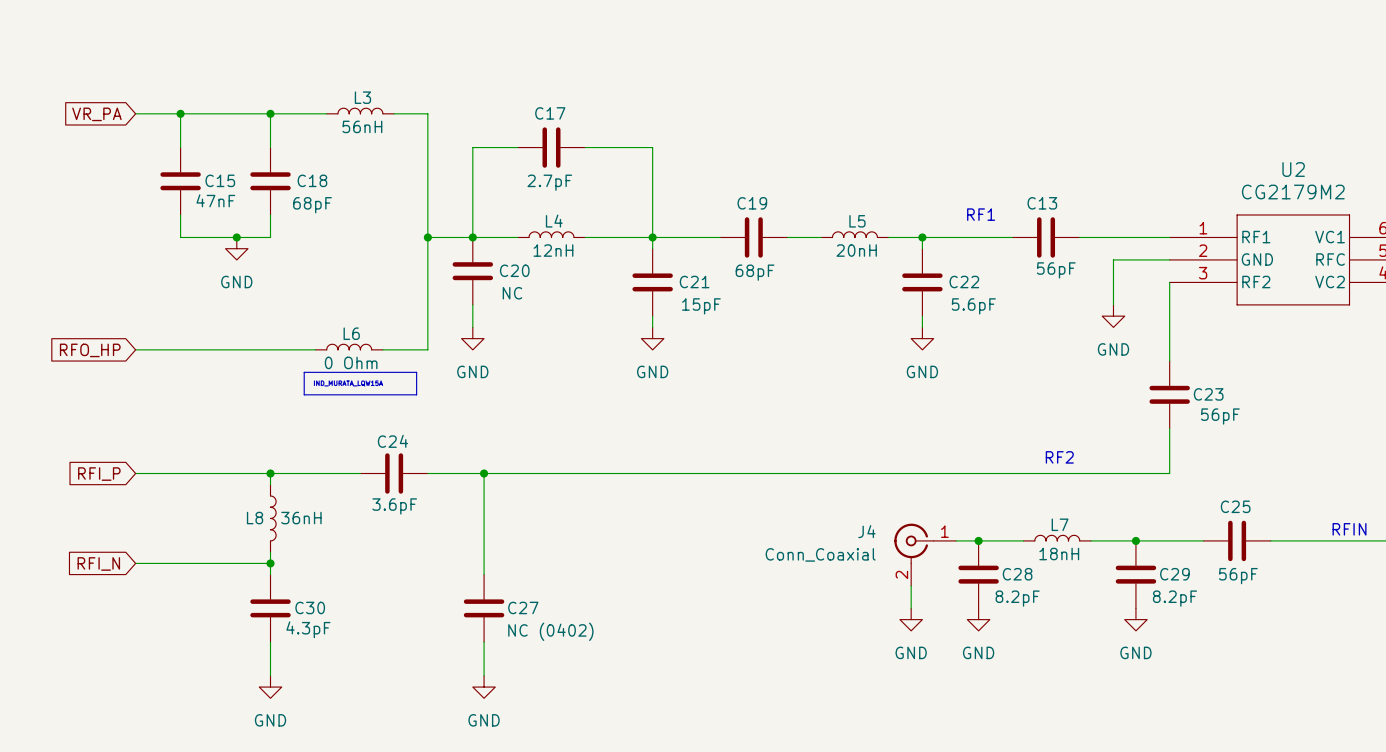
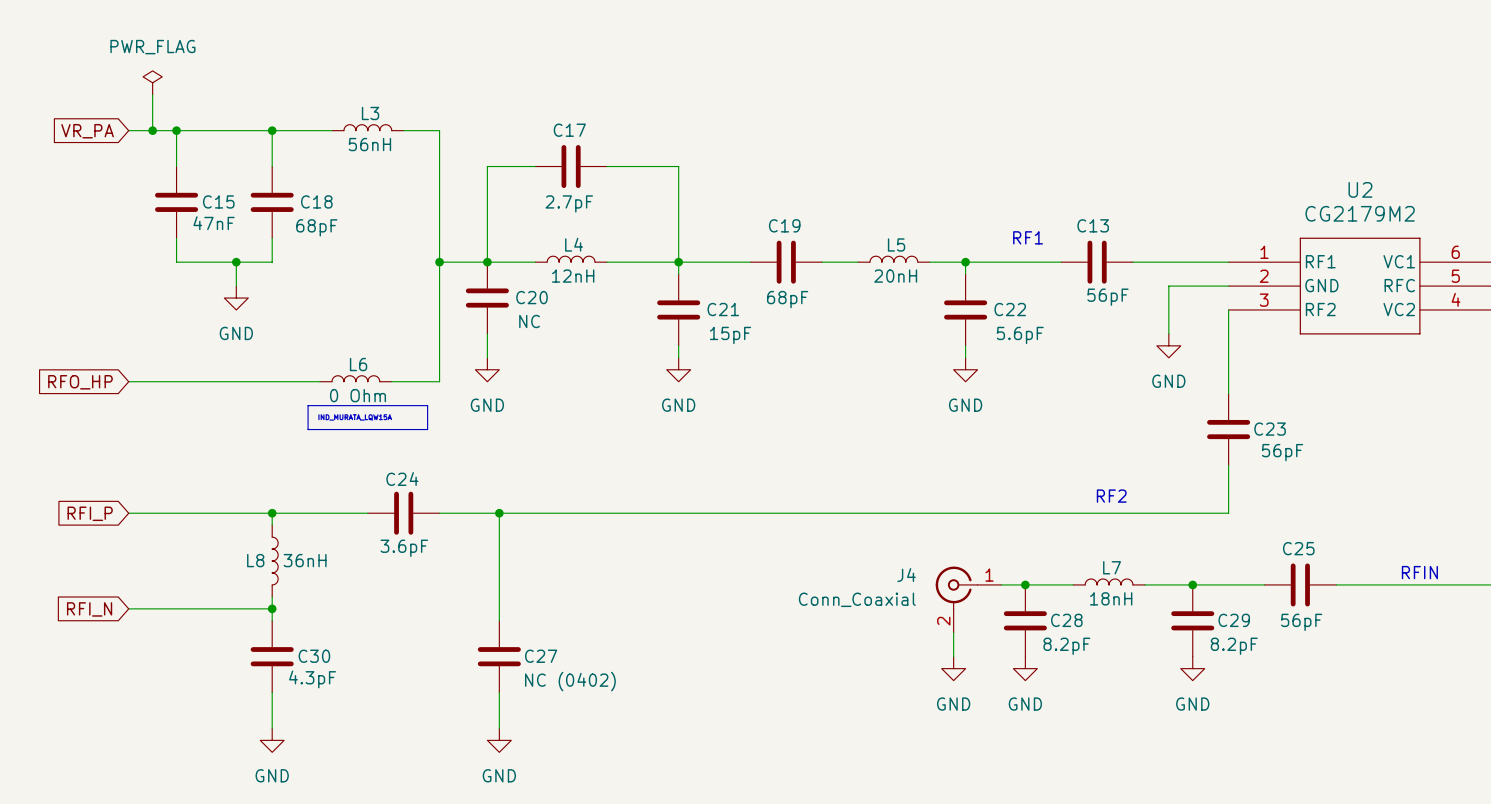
power symbol: none -> PWR_FLAG (152, 82)
wire: none -> (152, 94) (152, 130)
junction: none -> (152, 130)
power symbol position: GND (236, 248) -> GND (236, 298)

